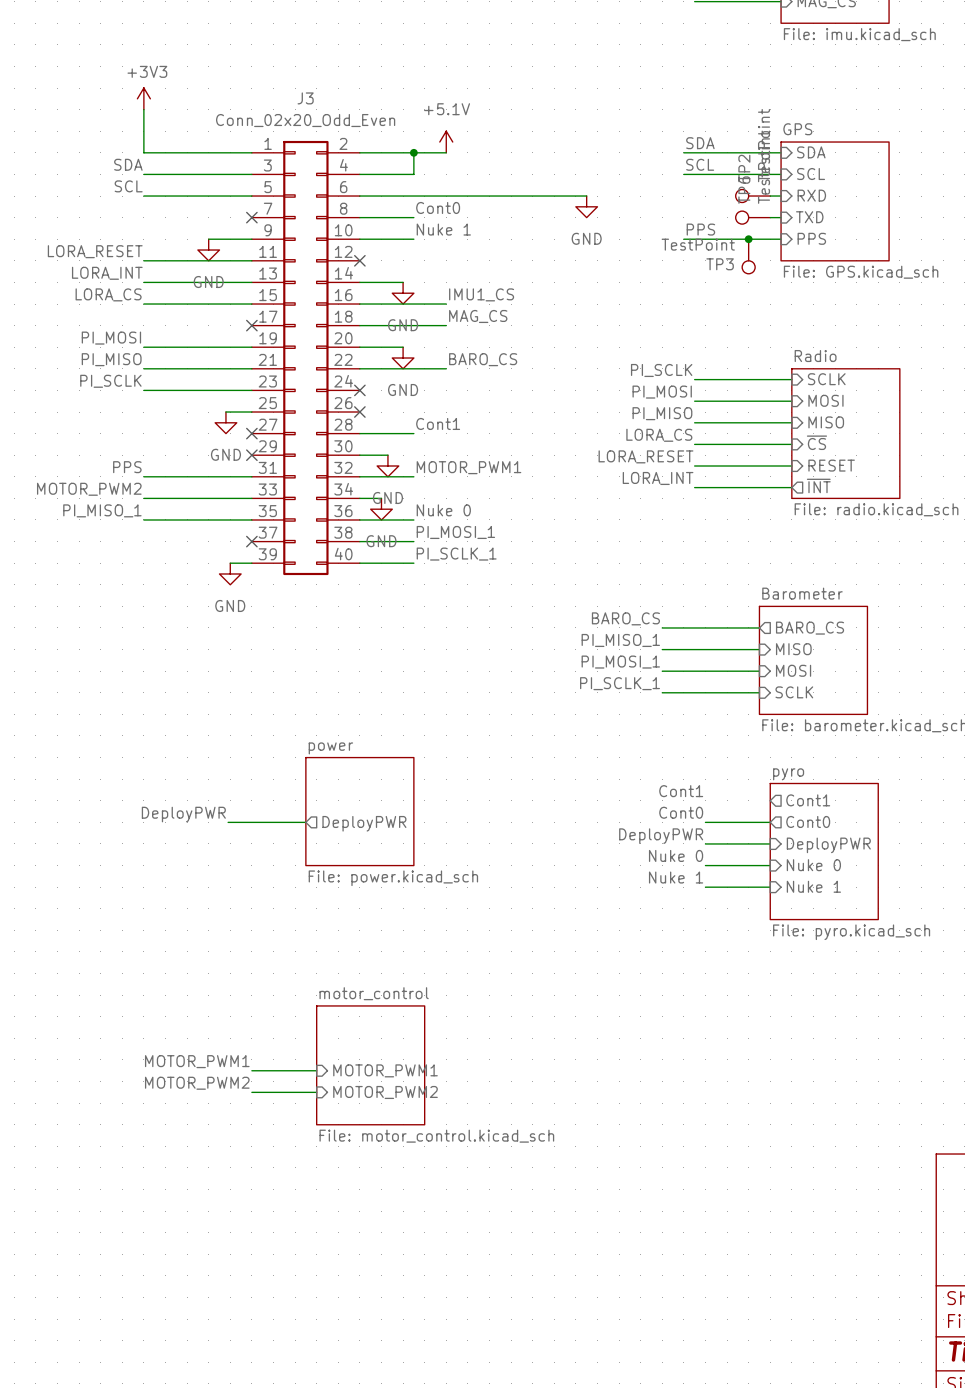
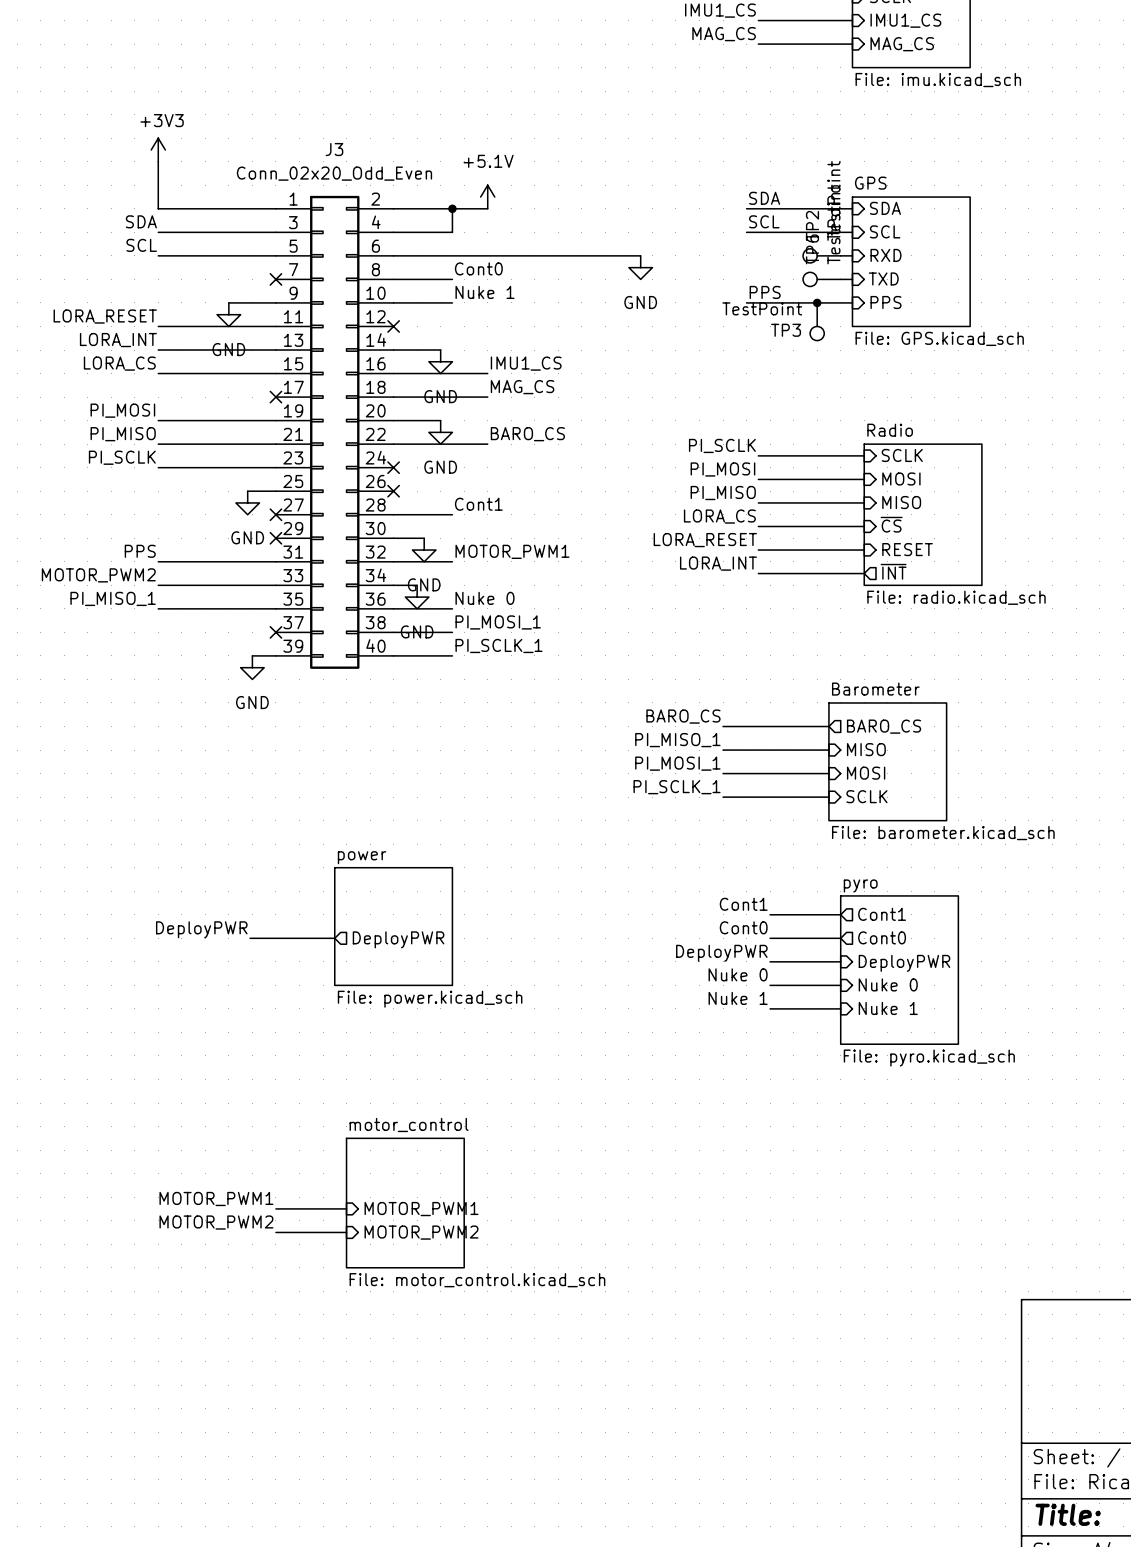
wire: none -> (770, 914) (840, 914)

